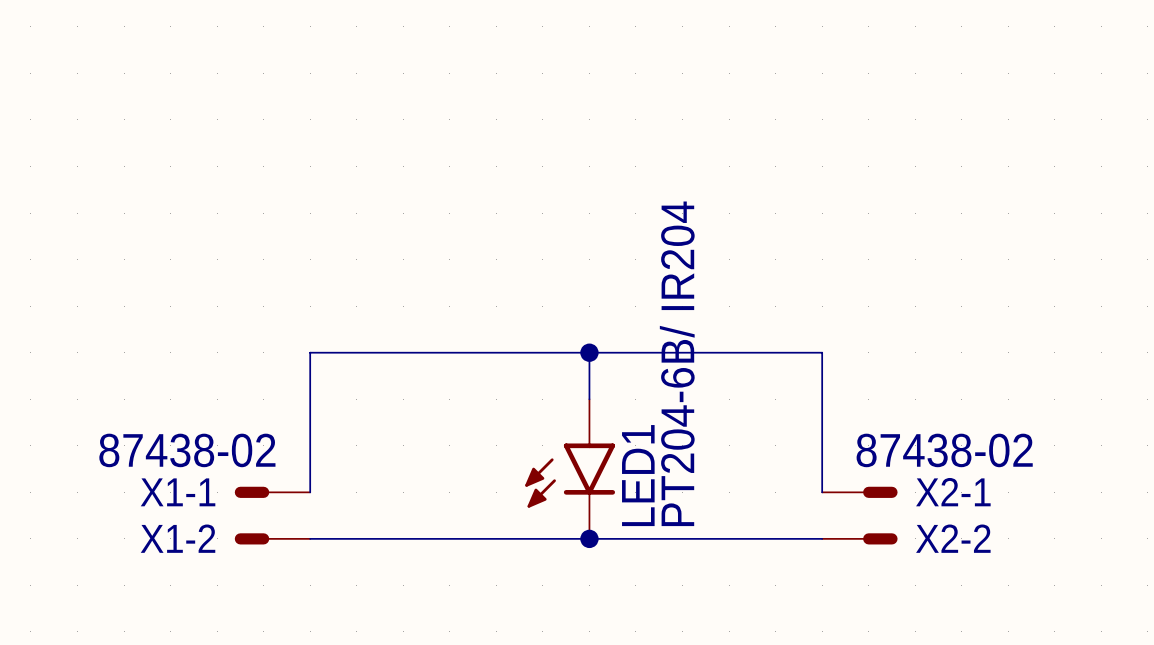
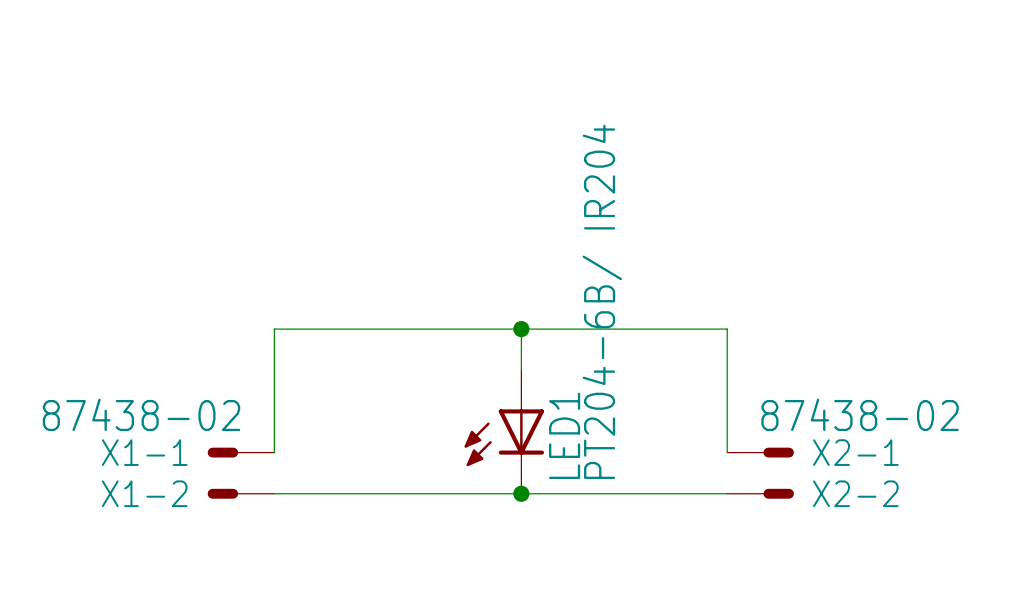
LED1 symbol: [525, 399, 616, 539] -> [464, 370, 545, 494]

